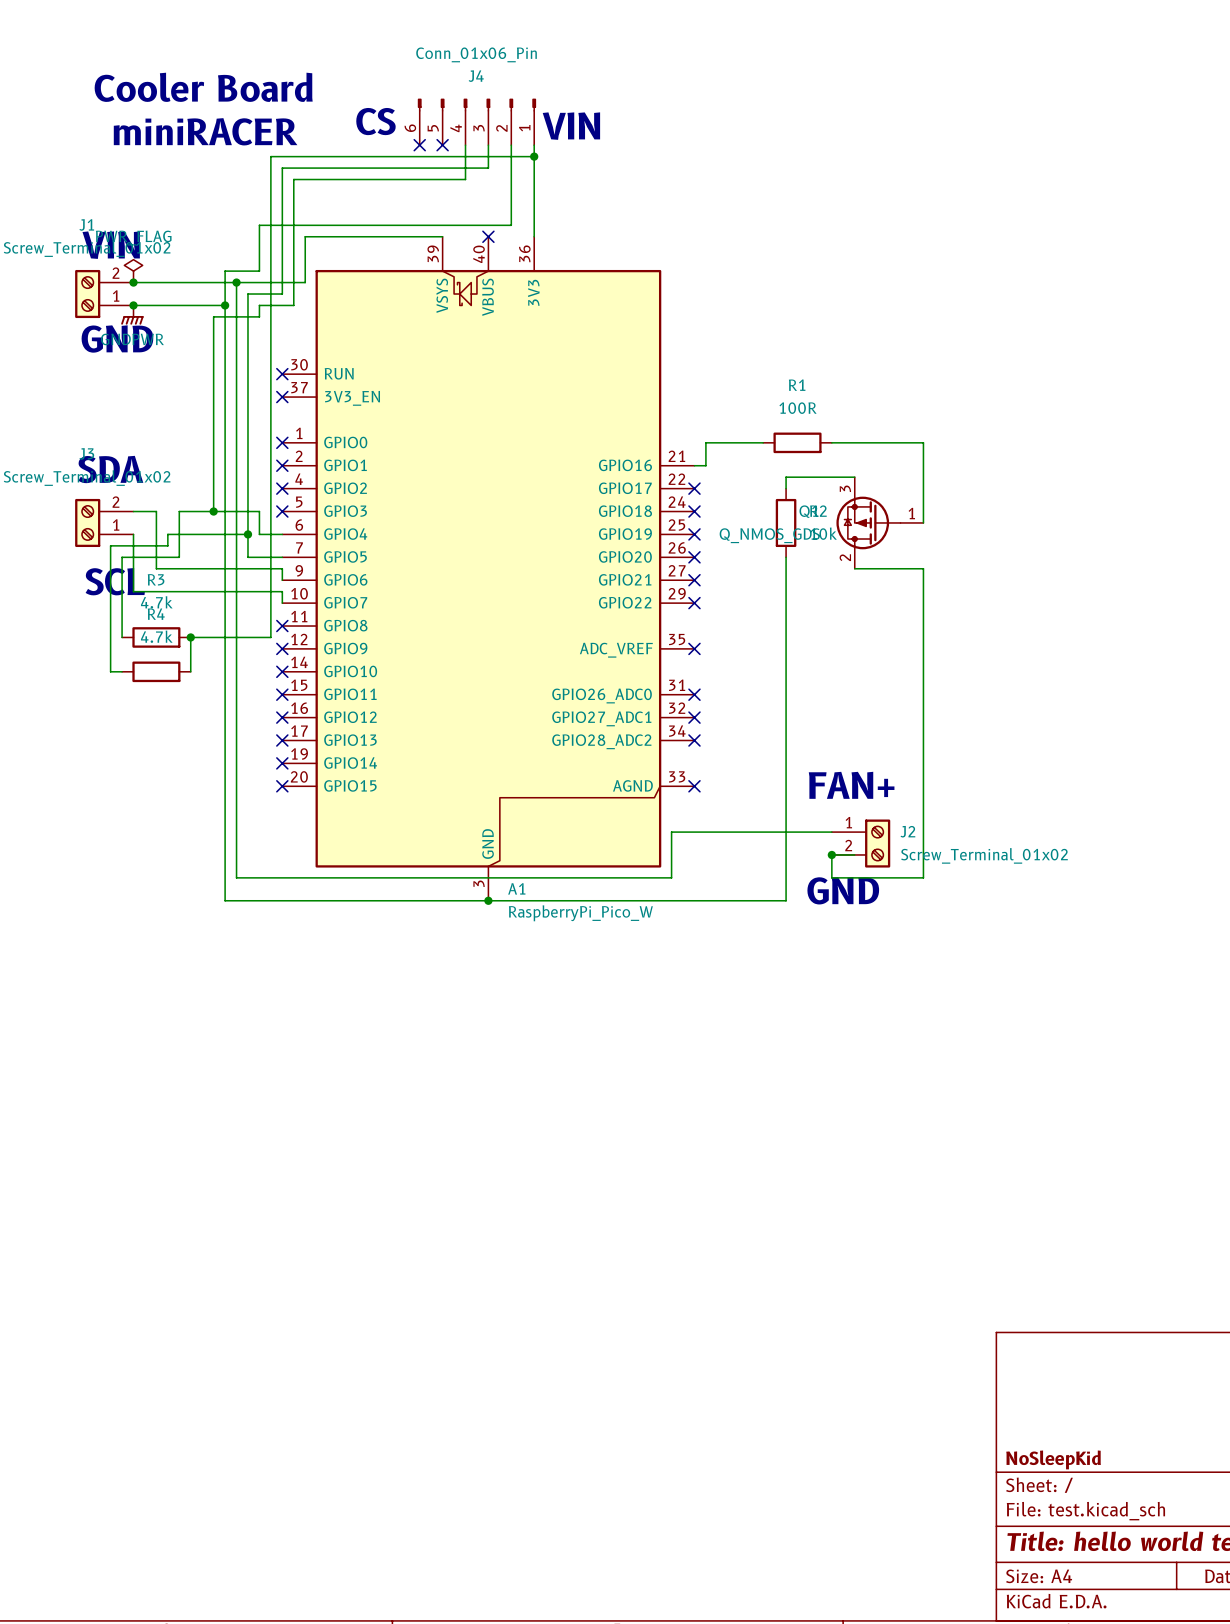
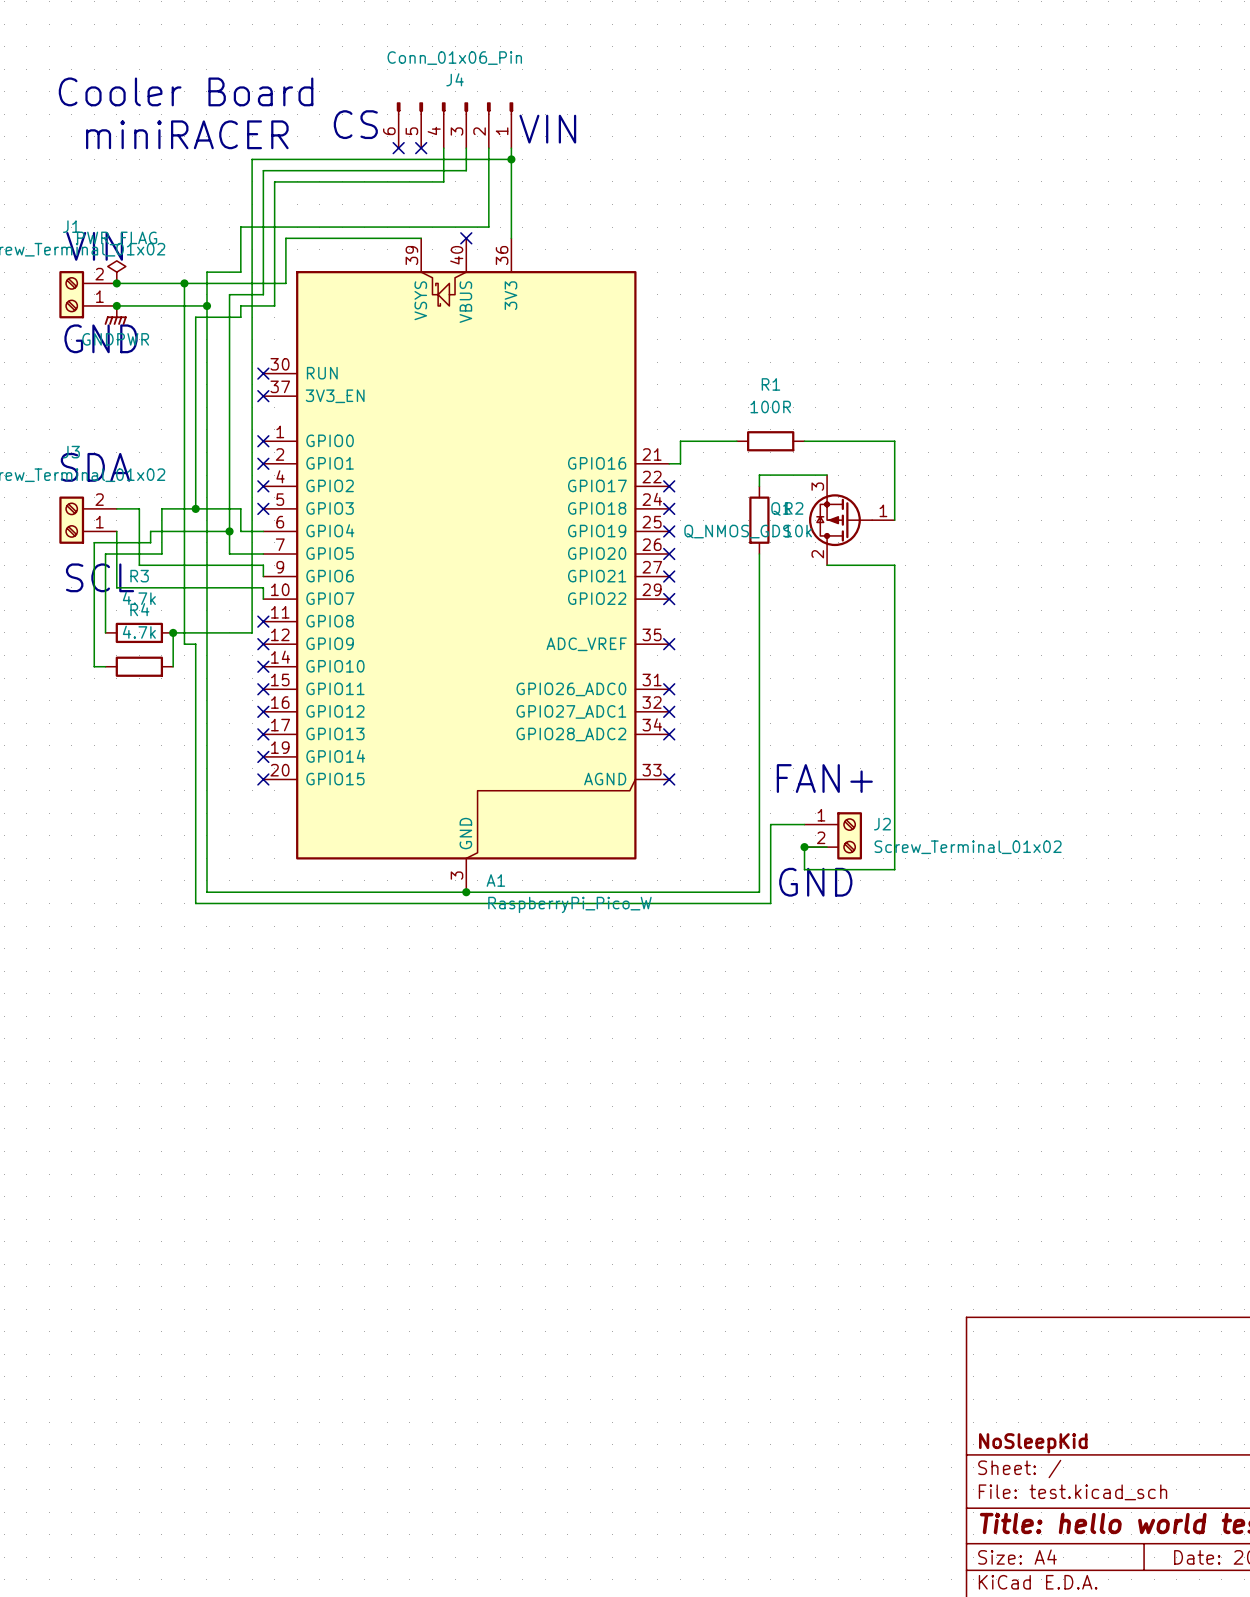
wire: (236, 282) (236, 877) (671, 877) (671, 832) (797, 832) -> (184, 283) (184, 644) (195, 644) (195, 903) (770, 903) (770, 824)
junction position: (236, 282) -> (184, 283)

